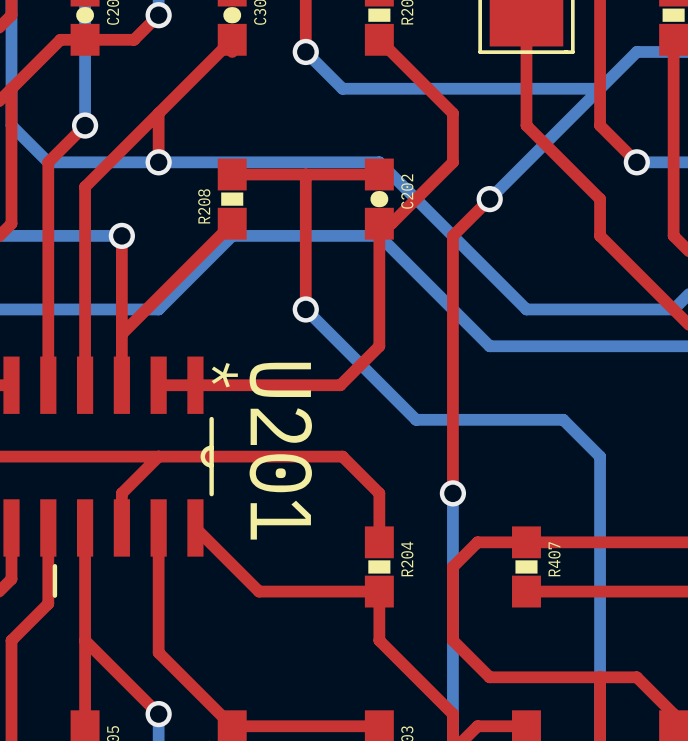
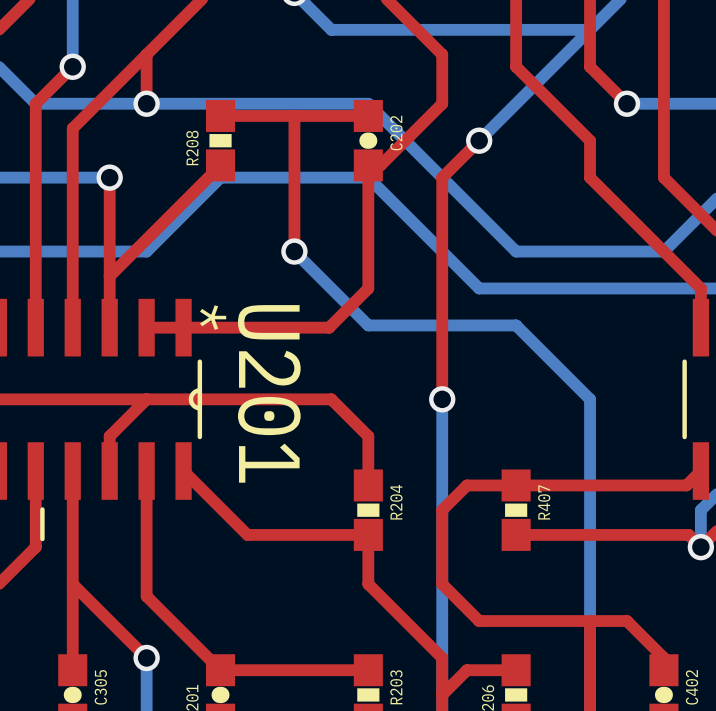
bottom track: (379, 383) (416, 419) (563, 419) -> (368, 325) (516, 325) (553, 362)
top track: (452, 456) (452, 493) -> none
bottom track: none -> (442, 399) (442, 436)
via position: (452, 493) -> (442, 399)

